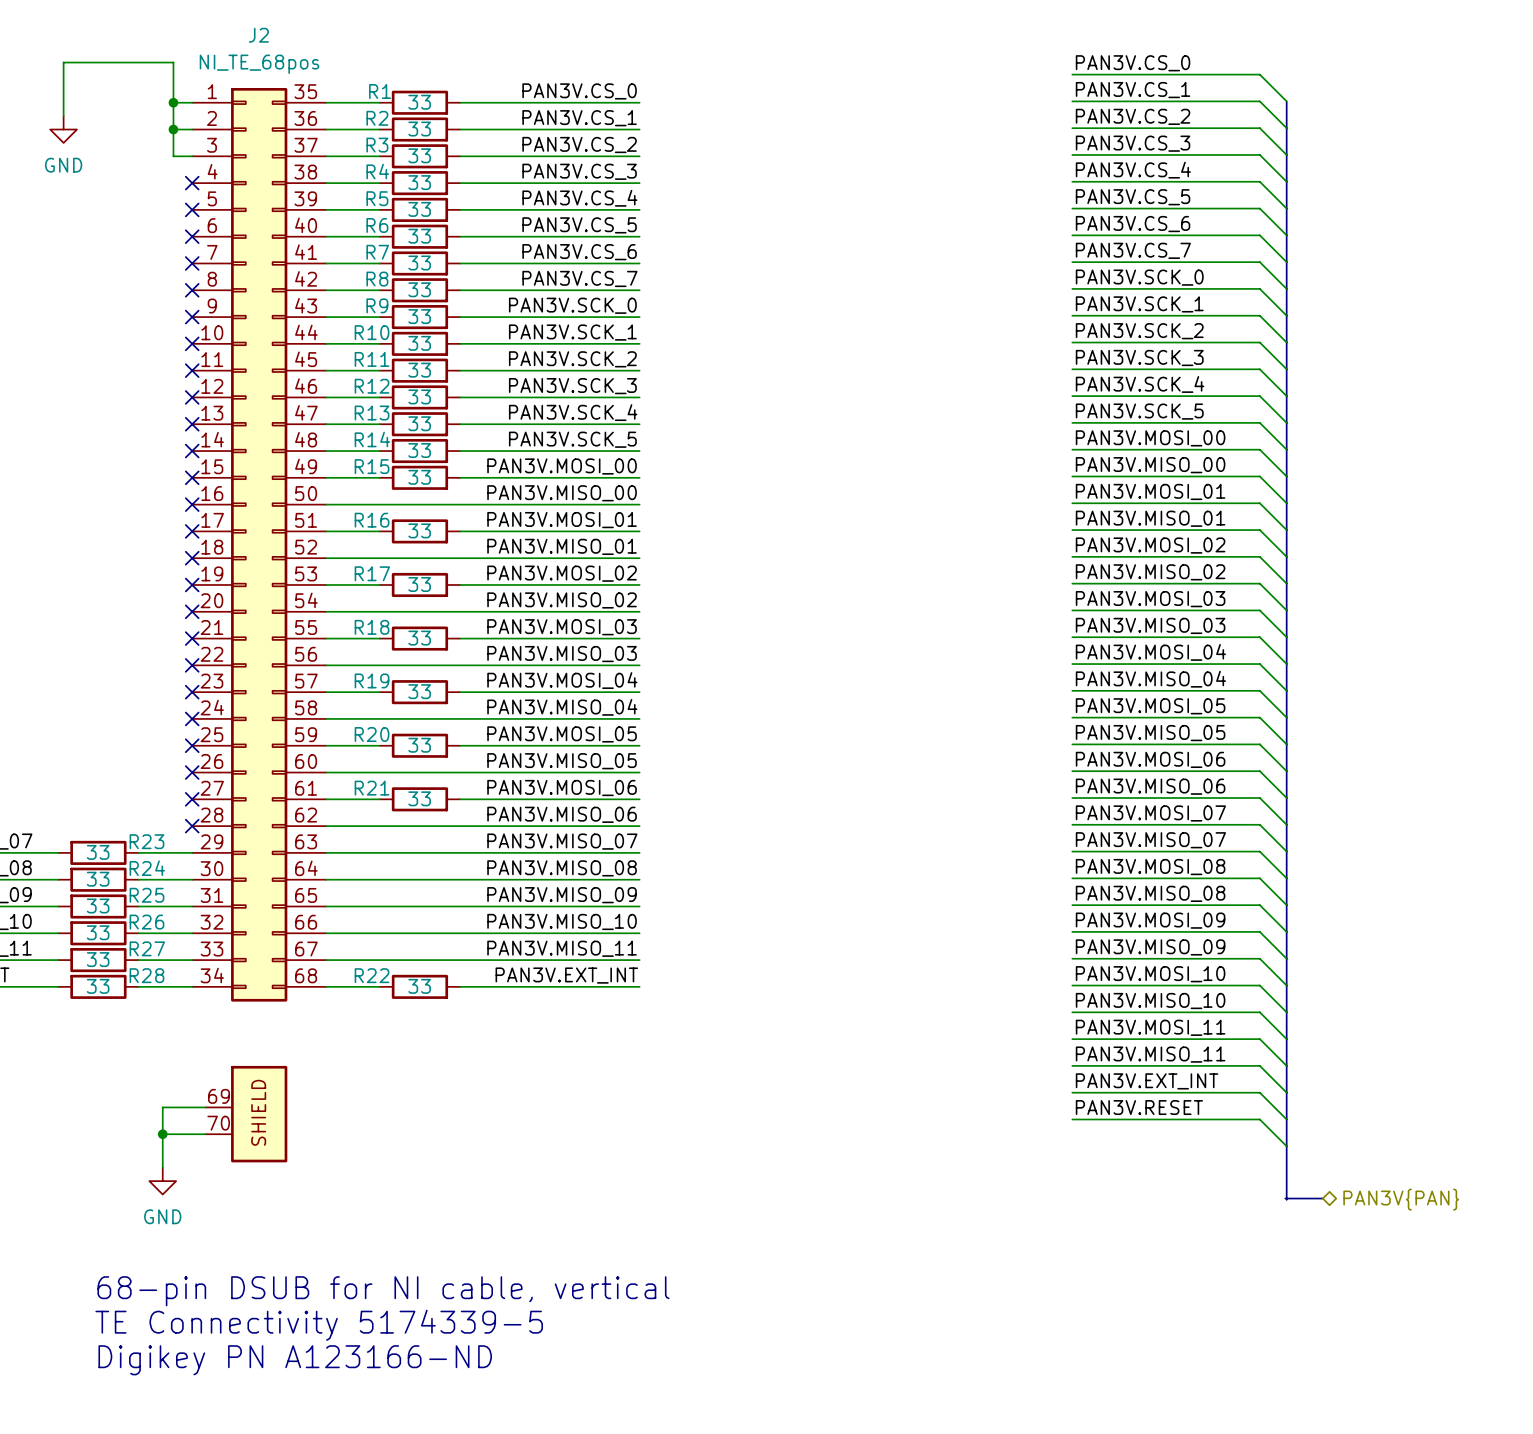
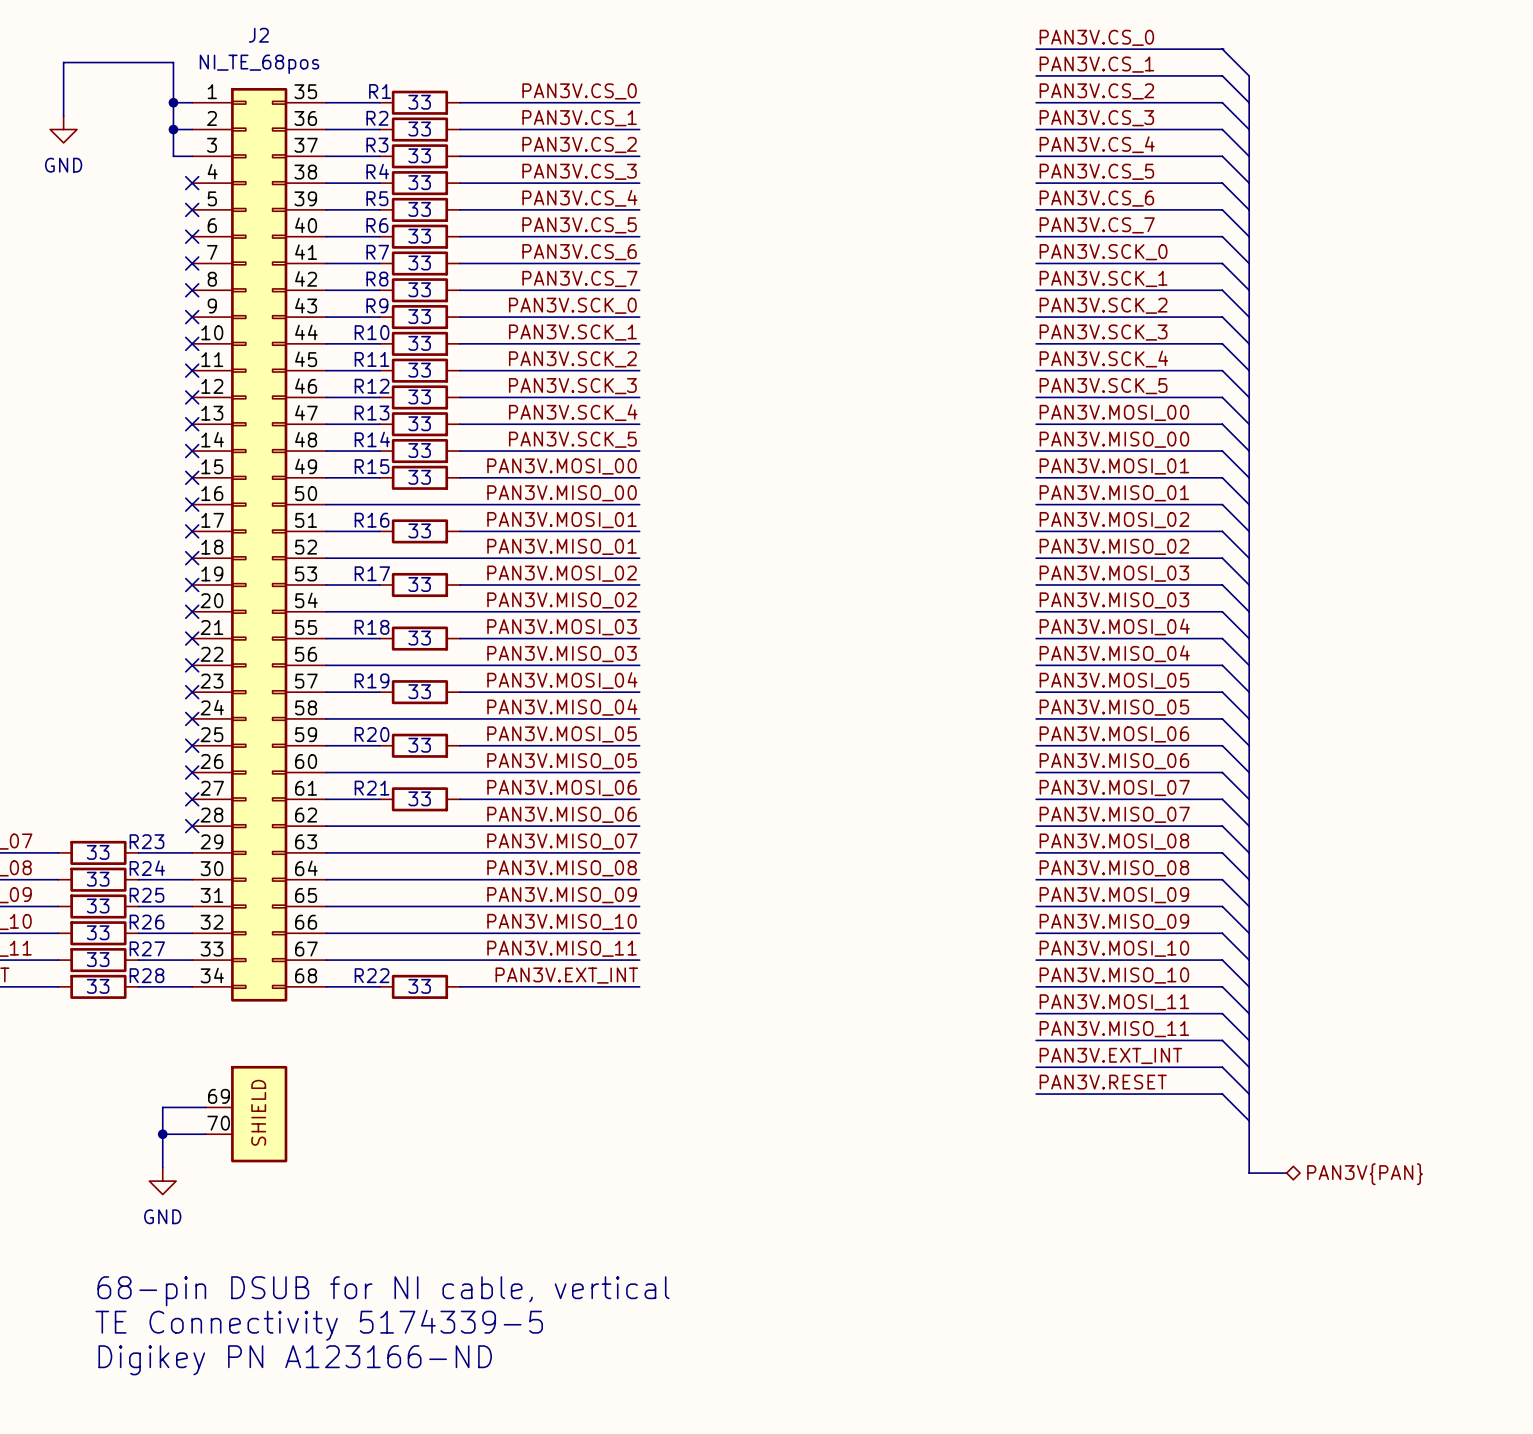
wire: none -> (1036, 49) (1223, 49)
wire: none -> (1222, 49) (1249, 75)
label position: PAN3V.CS_0 (1133, 63) -> PAN3V.CS_0 (1096, 37)
wire: (1072, 74) (1259, 74) (1286, 101) -> none
wire: none -> (1036, 75) (1222, 75) (1249, 102)
bus: none -> (1249, 75) (1249, 1173) (1286, 1173)
label position: PAN3V.CS_1 (1133, 90) -> PAN3V.CS_1 (1096, 64)
wire: (1072, 101) (1259, 101) (1286, 128) -> none
bus: (1286, 101) (1286, 1199) -> none
wire: none -> (1036, 102) (1222, 102) (1249, 129)
label position: PAN3V.CS_2 (1133, 116) -> PAN3V.CS_2 (1096, 91)
wire: (1072, 128) (1259, 128) (1286, 154) -> none
wire: none -> (1036, 129) (1222, 129) (1249, 156)
label position: PAN3V.CS_3 (1133, 143) -> PAN3V.CS_3 (1096, 118)
wire: (1072, 154) (1259, 154) (1286, 181) -> none
wire: none -> (1036, 156) (1222, 156) (1249, 183)
label position: PAN3V.CS_4 (1133, 170) -> PAN3V.CS_4 (1097, 144)
wire: (1072, 181) (1259, 181) (1286, 208) -> none
wire: none -> (1036, 183) (1222, 183) (1249, 209)
label position: PAN3V.CS_5 (1133, 197) -> PAN3V.CS_5 (1096, 171)
wire: (1072, 208) (1259, 208) (1286, 235) -> none
wire: none -> (1036, 209) (1222, 209) (1249, 236)
label position: PAN3V.CS_6 (1133, 224) -> PAN3V.CS_6 (1096, 198)
wire: (1072, 235) (1259, 235) (1286, 262) -> none
wire: none -> (1036, 236) (1222, 236) (1249, 263)
label position: PAN3V.CS_7 (1133, 250) -> PAN3V.CS_7 (1097, 225)
wire: (1072, 262) (1259, 262) (1286, 288) -> none
wire: none -> (1036, 263) (1222, 263) (1249, 290)
label position: PAN3V.SCK_0 (1139, 277) -> PAN3V.SCK_0 (1103, 252)
wire: (1072, 288) (1259, 288) (1286, 315) -> none
wire: none -> (1036, 290) (1222, 290) (1249, 317)
label position: PAN3V.SCK_1 (1139, 304) -> PAN3V.SCK_1 (1103, 278)
wire: (1072, 315) (1259, 315) (1286, 342) -> none
wire: none -> (1036, 317) (1222, 317) (1249, 343)
label position: PAN3V.SCK_2 (1139, 331) -> PAN3V.SCK_2 (1103, 305)
wire: (1072, 342) (1259, 342) (1286, 369) -> none
wire: none -> (1036, 343) (1222, 343) (1249, 370)
label position: PAN3V.SCK_3 (1139, 358) -> PAN3V.SCK_3 (1103, 332)
wire: (1072, 369) (1259, 369) (1286, 396) -> none
wire: none -> (1036, 370) (1222, 370) (1249, 397)
label position: PAN3V.SCK_4 (1140, 384) -> PAN3V.SCK_4 (1103, 359)
wire: (1072, 396) (1259, 396) (1286, 422) -> none
wire: none -> (1036, 397) (1222, 397) (1249, 424)
label position: PAN3V.SCK_5 (1139, 411) -> PAN3V.SCK_5 (1103, 386)
wire: (1072, 422) (1259, 422) (1286, 449) -> none
wire: none -> (1036, 424) (1222, 424) (1249, 451)
label position: PAN3V.MOSI_00 (1150, 438) -> PAN3V.MOSI_00 (1114, 412)
wire: (1072, 449) (1259, 449) (1286, 476) -> none
wire: none -> (1036, 451) (1222, 451) (1249, 477)
label position: PAN3V.MISO_00 (1150, 465) -> PAN3V.MISO_00 (1114, 439)
wire: (1072, 476) (1259, 476) (1286, 503) -> none
wire: none -> (1036, 477) (1222, 477) (1249, 504)
label position: PAN3V.MOSI_01 (1150, 491) -> PAN3V.MOSI_01 (1114, 466)
wire: (1072, 503) (1259, 503) (1286, 530) -> none
wire: none -> (1036, 504) (1222, 504) (1249, 531)
label position: PAN3V.MISO_01 (1150, 518) -> PAN3V.MISO_01 (1114, 493)
wire: (1072, 530) (1259, 530) (1286, 556) -> none
wire: none -> (1036, 531) (1222, 531) (1249, 558)
label position: PAN3V.MOSI_02 (1150, 545) -> PAN3V.MOSI_02 (1114, 520)
wire: (1072, 556) (1259, 556) (1286, 583) -> none
wire: none -> (1036, 558) (1222, 558) (1249, 584)
label position: PAN3V.MISO_02 (1150, 572) -> PAN3V.MISO_02 (1114, 546)
wire: (1072, 583) (1259, 583) (1286, 610) -> none
wire: none -> (1036, 584) (1222, 584) (1249, 611)
label position: PAN3V.MOSI_03 (1150, 599) -> PAN3V.MOSI_03 (1114, 573)
wire: (1072, 610) (1259, 610) (1286, 637) -> none
wire: none -> (1036, 611) (1222, 611) (1249, 638)
label position: PAN3V.MISO_03 (1150, 625) -> PAN3V.MISO_03 (1114, 600)
wire: (1072, 637) (1259, 637) (1286, 664) -> none
wire: none -> (1036, 638) (1222, 638) (1249, 665)
label position: PAN3V.MOSI_04 (1150, 652) -> PAN3V.MOSI_04 (1114, 626)
wire: (1072, 664) (1259, 664) (1286, 690) -> none
wire: none -> (1036, 665) (1222, 665) (1249, 692)
label position: PAN3V.MISO_04 (1150, 679) -> PAN3V.MISO_04 (1114, 653)
wire: (1072, 690) (1259, 690) (1286, 717) -> none
wire: none -> (1036, 692) (1222, 692) (1249, 718)
label position: PAN3V.MOSI_05 (1150, 706) -> PAN3V.MOSI_05 (1114, 680)
wire: (1072, 717) (1259, 717) (1286, 744) -> none
wire: none -> (1036, 718) (1222, 718) (1249, 745)
label position: PAN3V.MISO_05 (1150, 733) -> PAN3V.MISO_05 (1114, 707)
wire: (1072, 744) (1259, 744) (1286, 771) -> none
wire: none -> (1036, 745) (1222, 745) (1249, 772)
label position: PAN3V.MOSI_06 (1150, 759) -> PAN3V.MOSI_06 (1114, 734)
wire: (1072, 771) (1259, 771) (1286, 797) -> none
wire: none -> (1036, 772) (1222, 772) (1249, 799)
label position: PAN3V.MISO_06 (1150, 786) -> PAN3V.MISO_06 (1114, 761)
wire: (1072, 797) (1259, 797) (1286, 824) -> none
wire: none -> (1036, 799) (1222, 799) (1249, 826)
label position: PAN3V.MOSI_07 (1150, 813) -> PAN3V.MOSI_07 (1114, 788)
wire: (1072, 824) (1259, 824) (1286, 851) -> none
wire: none -> (1036, 826) (1222, 826) (1249, 852)
label position: PAN3V.MISO_07 (1150, 840) -> PAN3V.MISO_07 (1114, 814)
wire: (1072, 851) (1259, 851) (1286, 878) -> none
wire: none -> (1036, 852) (1222, 852) (1249, 879)
label position: PAN3V.MOSI_08 (1150, 867) -> PAN3V.MOSI_08 (1114, 841)
wire: (1072, 878) (1259, 878) (1286, 905) -> none
wire: none -> (1036, 879) (1222, 879) (1249, 906)
label position: PAN3V.MISO_08 (1150, 893) -> PAN3V.MISO_08 (1114, 868)
wire: (1072, 905) (1259, 905) (1286, 931) -> none
wire: none -> (1036, 906) (1222, 906) (1249, 933)
label position: PAN3V.MOSI_09 (1150, 920) -> PAN3V.MOSI_09 (1114, 895)
wire: (1072, 931) (1259, 931) (1286, 958) -> none
wire: none -> (1036, 933) (1222, 933) (1249, 960)
label position: PAN3V.MISO_09 (1150, 947) -> PAN3V.MISO_09 (1114, 921)
wire: (1072, 958) (1259, 958) (1286, 985) -> none
wire: none -> (1036, 960) (1222, 960) (1249, 986)
label position: PAN3V.MOSI_10 (1150, 974) -> PAN3V.MOSI_10 (1114, 948)
wire: (1072, 985) (1259, 985) (1286, 1012) -> none
wire: none -> (1036, 986) (1222, 986) (1249, 1013)
label position: PAN3V.MISO_10 (1150, 1001) -> PAN3V.MISO_10 (1114, 975)
wire: (1072, 1012) (1259, 1012) (1286, 1039) -> none
wire: none -> (1036, 1013) (1222, 1013) (1249, 1040)
label position: PAN3V.MOSI_11 (1150, 1027) -> PAN3V.MOSI_11 (1114, 1002)
wire: (1072, 1039) (1259, 1039) (1286, 1065) -> none
wire: none -> (1036, 1040) (1222, 1040) (1249, 1067)
label position: PAN3V.MISO_11 (1150, 1054) -> PAN3V.MISO_11 (1114, 1029)
wire: (1072, 1065) (1259, 1065) (1286, 1092) -> none
wire: none -> (1036, 1067) (1222, 1067) (1249, 1094)
label position: PAN3V.EXT_INT (1147, 1081) -> PAN3V.EXT_INT (1110, 1055)
wire: (1072, 1092) (1259, 1092) (1286, 1119) -> none
wire: none -> (1036, 1094) (1222, 1094) (1249, 1120)
label position: PAN3V.RESET (1139, 1107) -> PAN3V.RESET (1103, 1082)
wire: (1072, 1119) (1259, 1119) (1286, 1146) -> none
bus: (1285, 1198) (1322, 1198) -> none
hierarchical label position: PAN3V{PAN} (1401, 1199) -> PAN3V{PAN} (1365, 1174)

